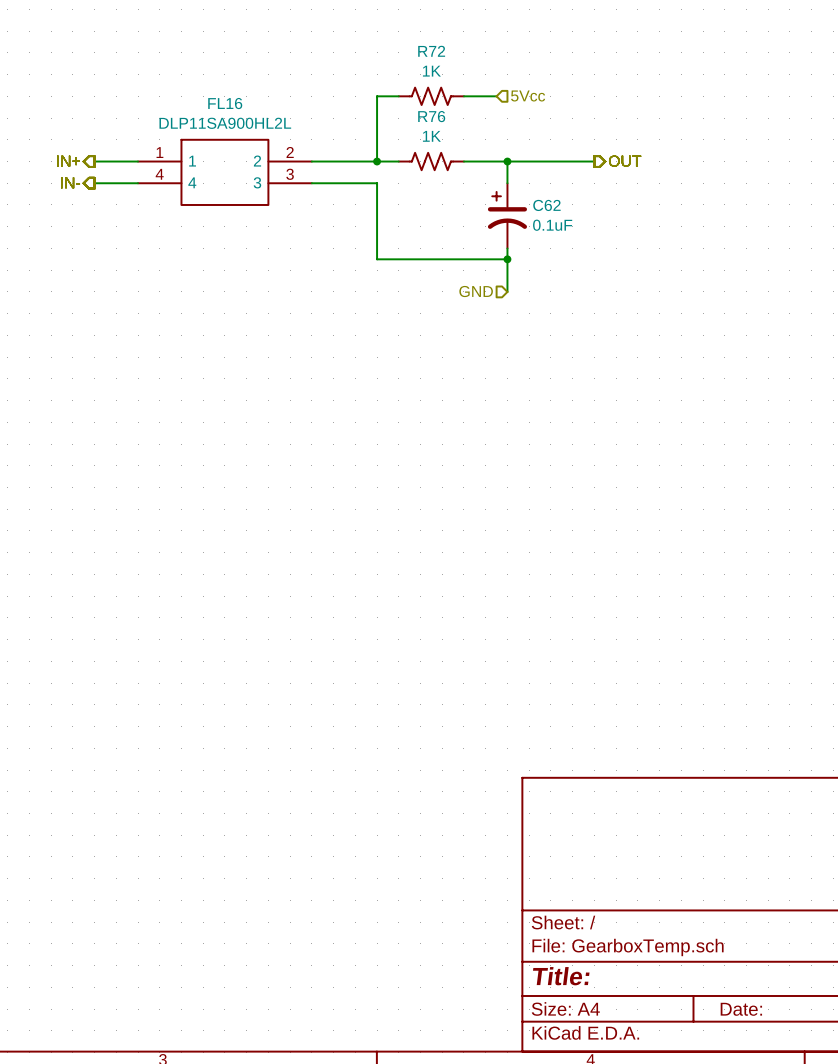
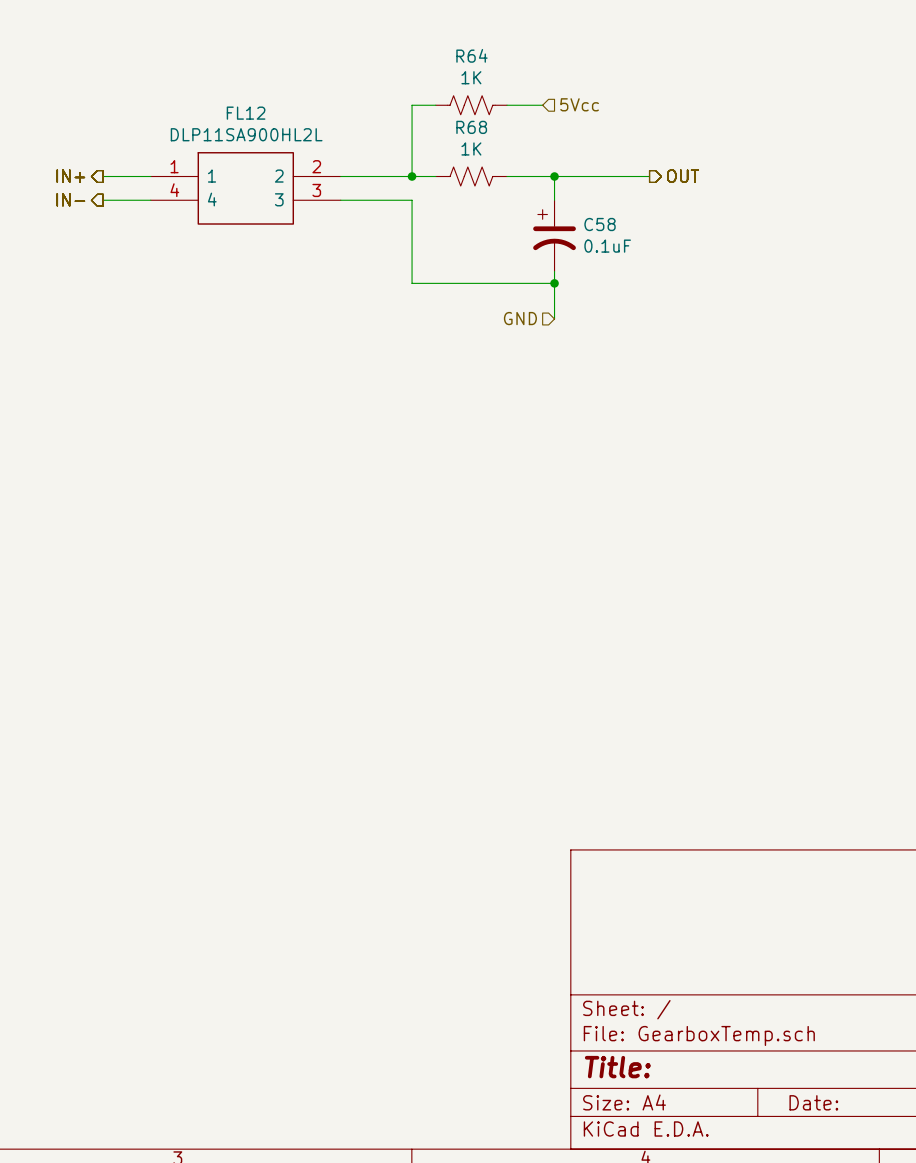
R72 name: R72 (431, 51) -> R64 (471, 55)
FL16 name: FL16 (225, 103) -> FL12 (246, 113)
R76 name: R76 (431, 116) -> R68 (471, 127)
C62 name: C62 (546, 205) -> C58 (600, 224)

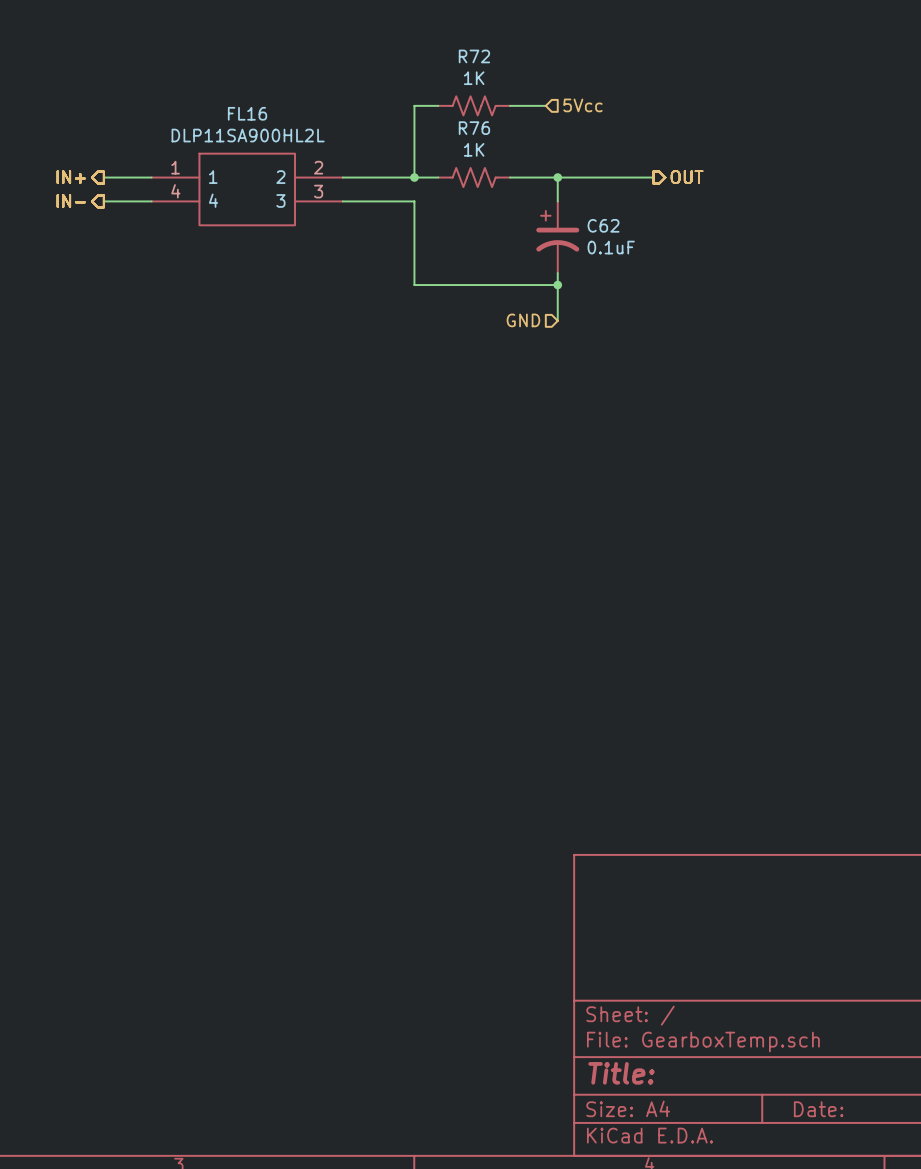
R64 name: R64 (471, 55) -> R72 (474, 56)
FL12 name: FL12 (246, 113) -> FL16 (247, 113)
R68 name: R68 (471, 127) -> R76 (474, 128)
C58 name: C58 (600, 224) -> C62 (603, 225)

